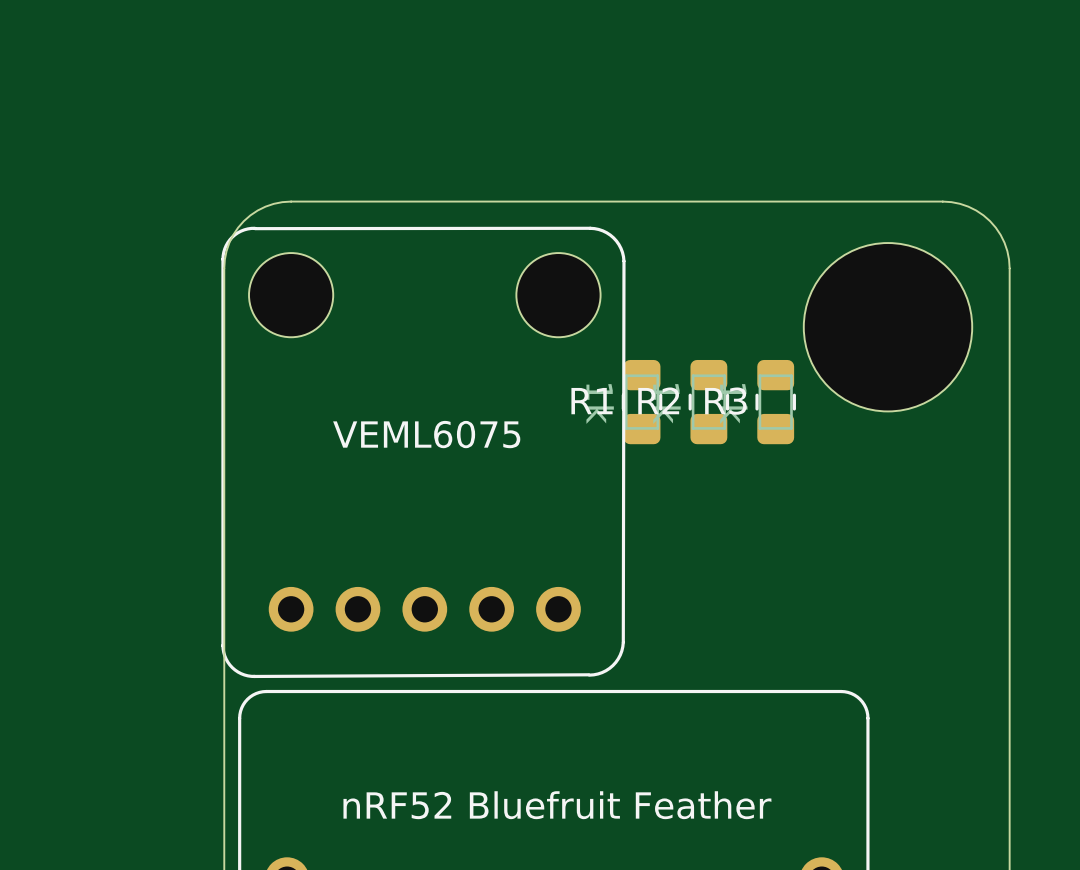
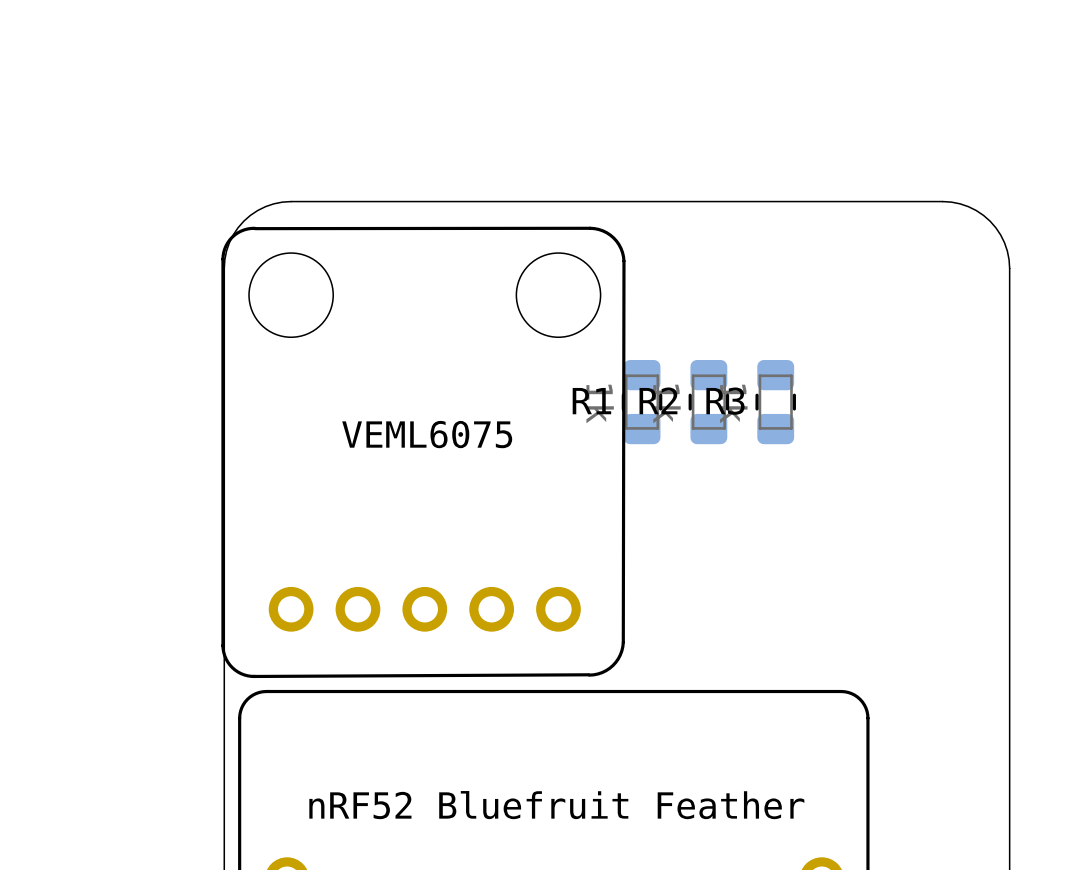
part: (888, 327) -> none

